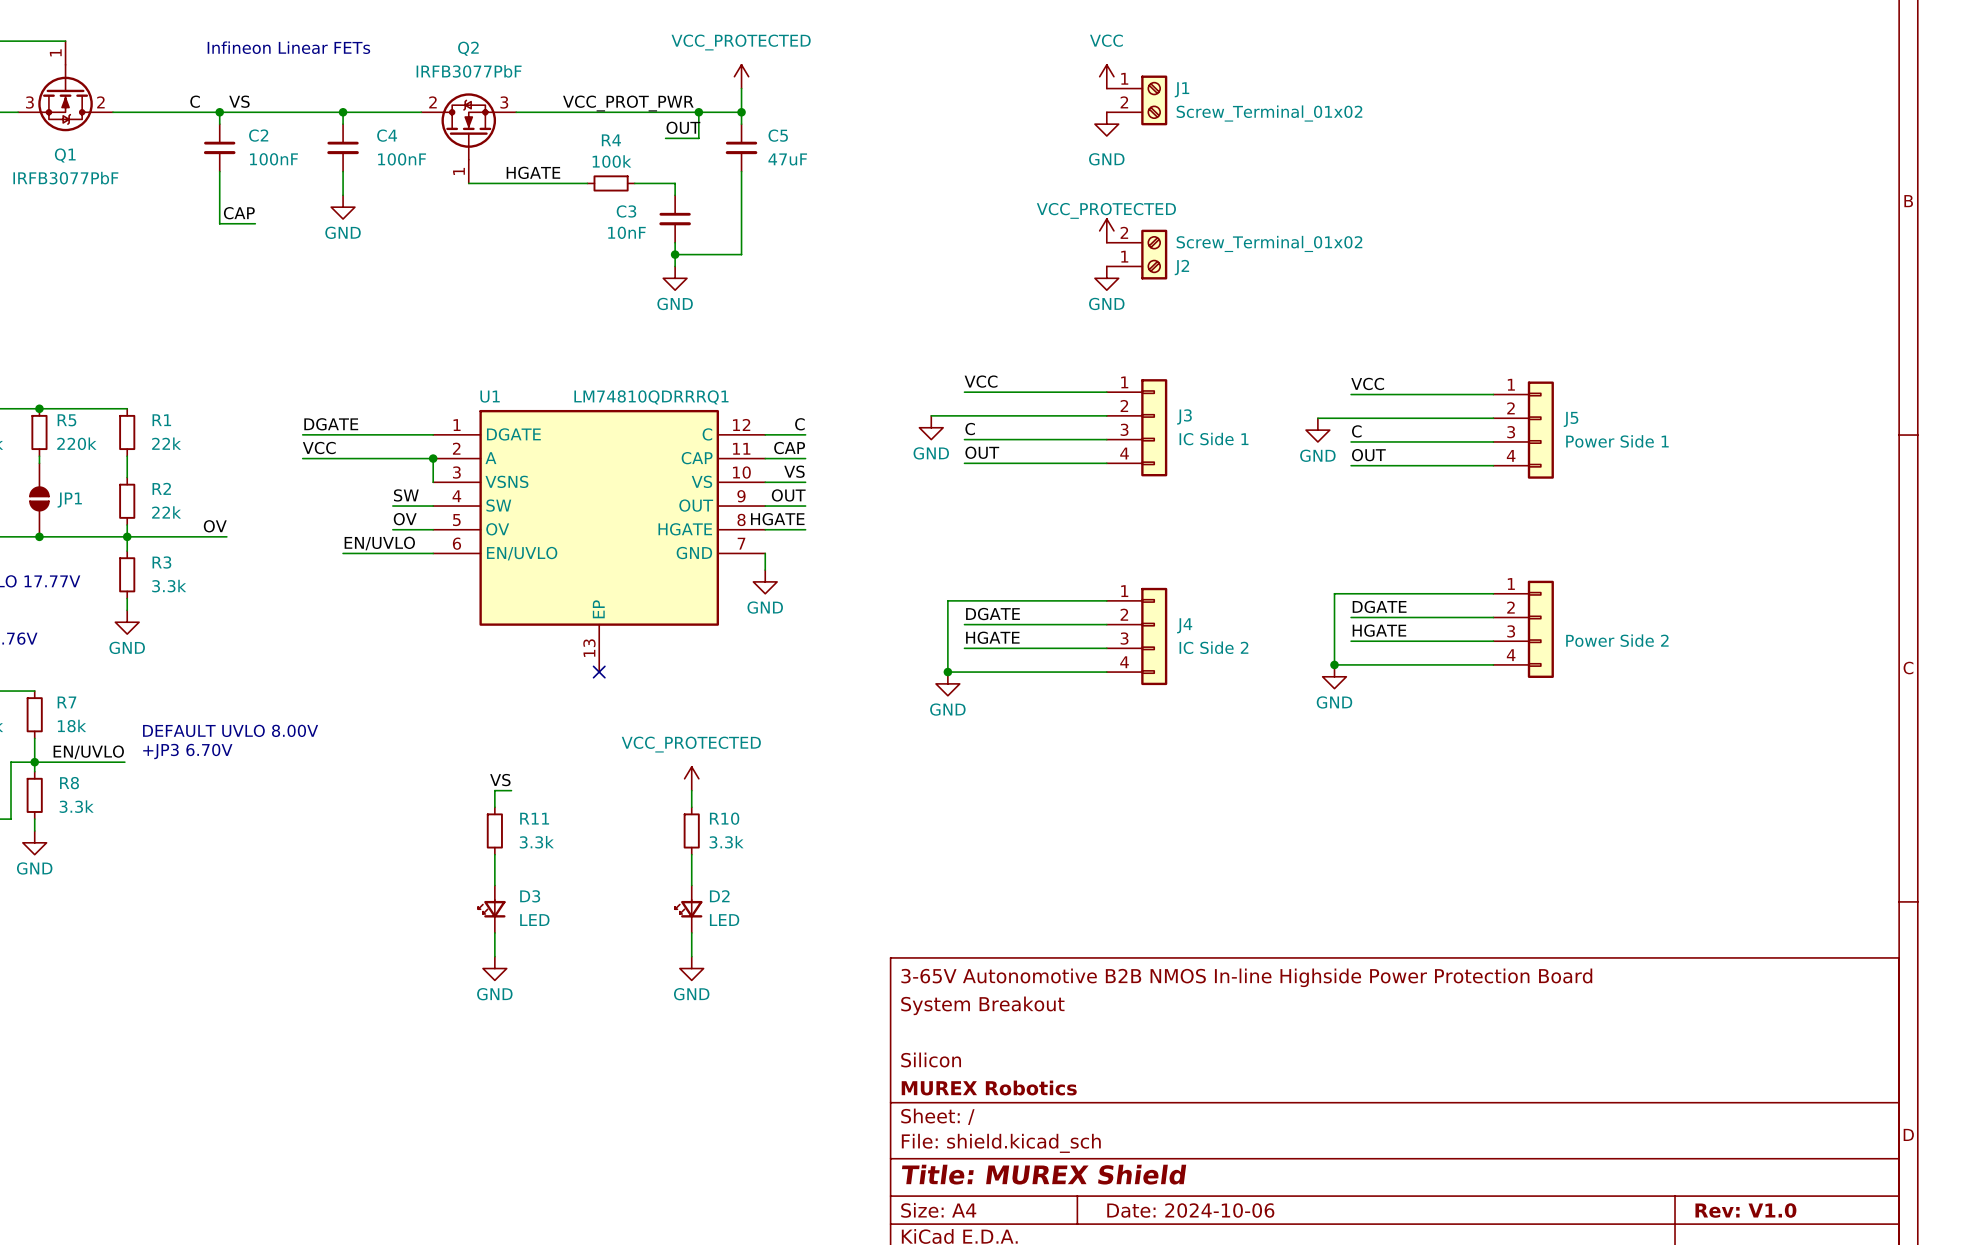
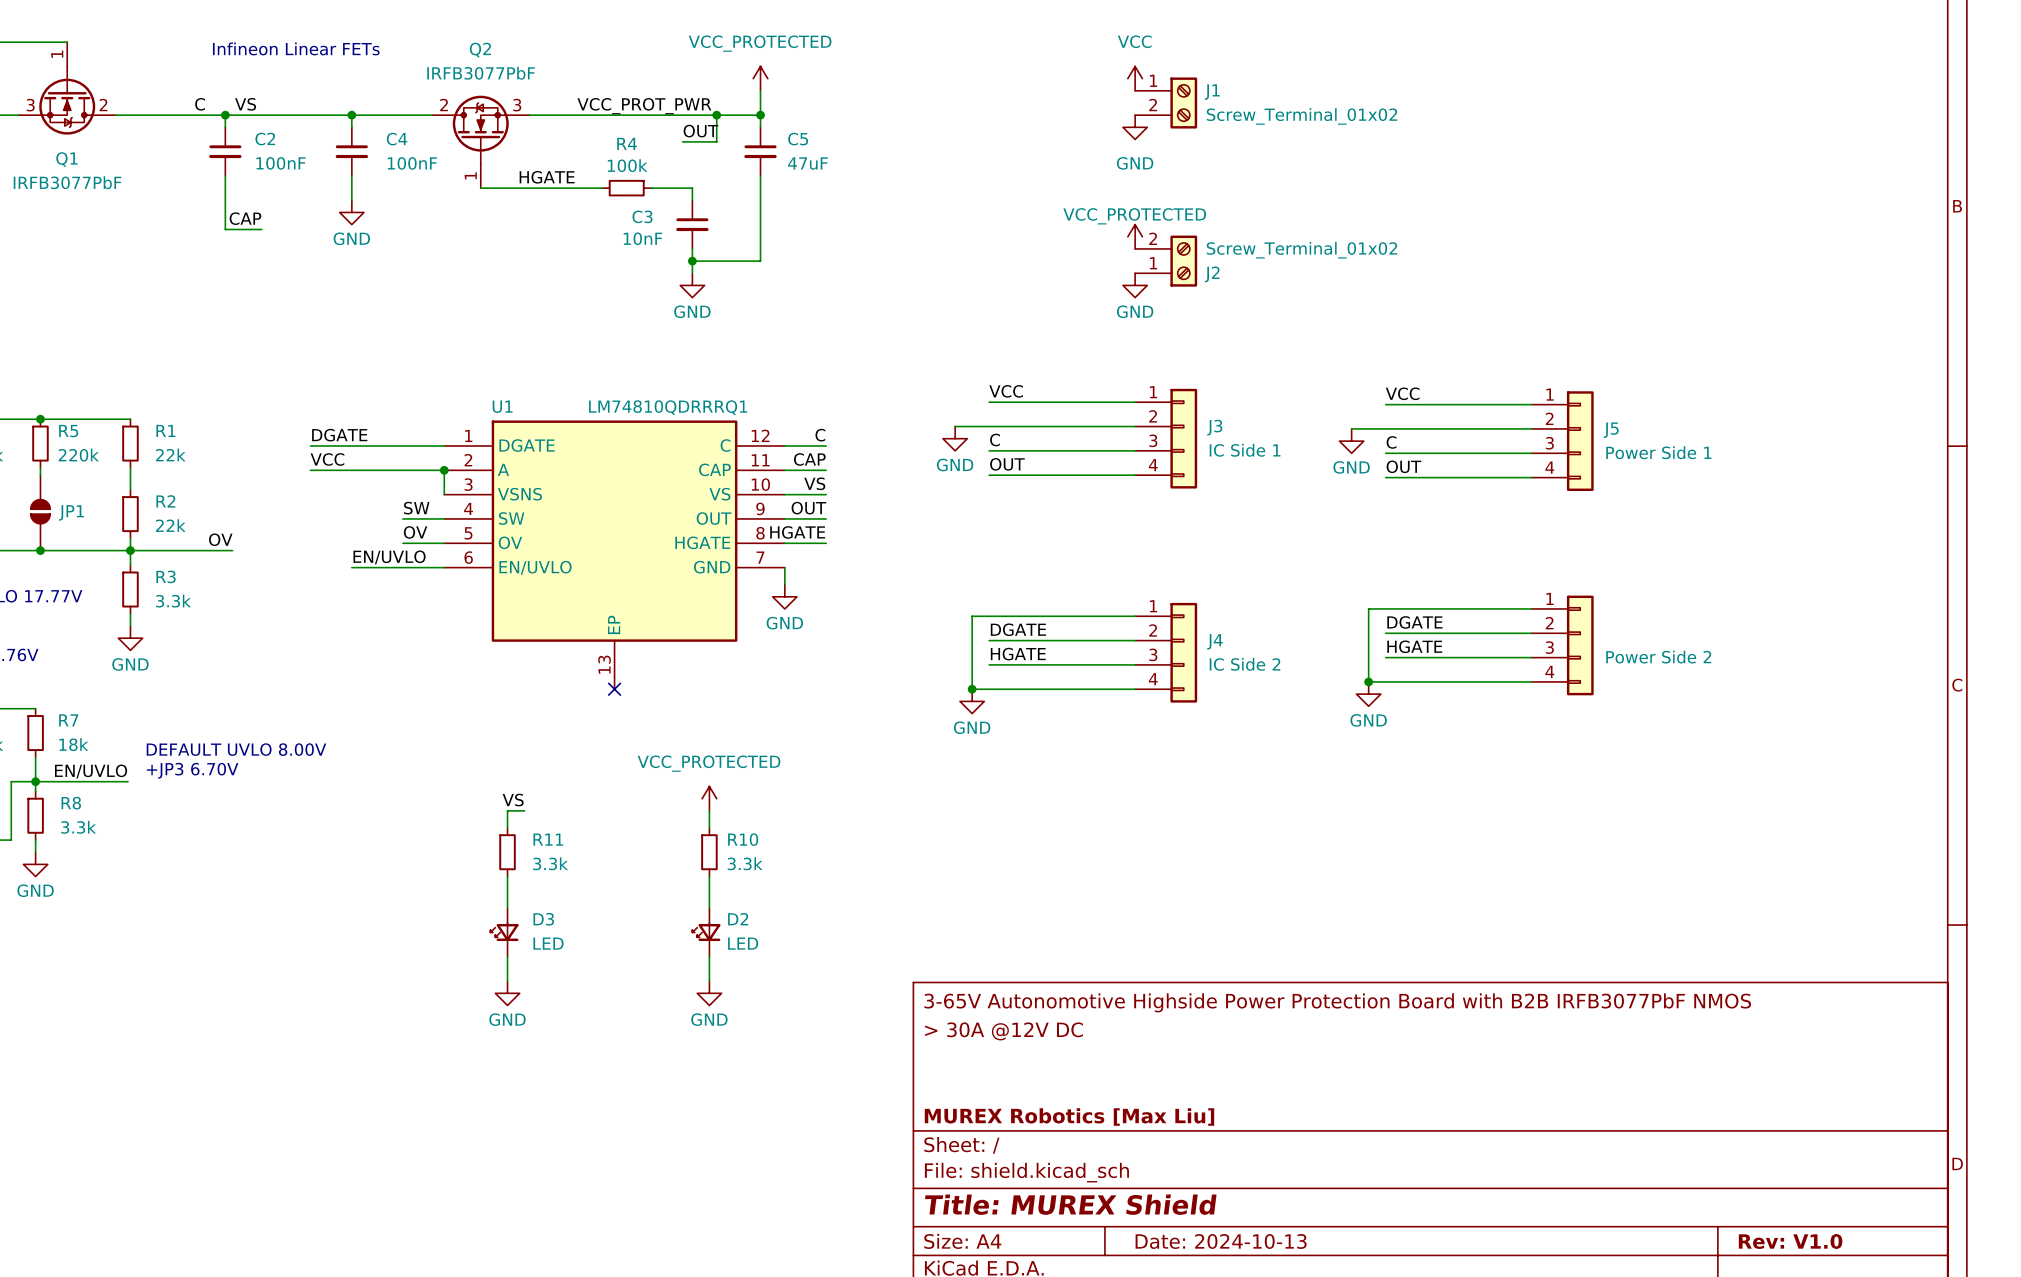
title block: 3-65V Autonomotive B2B NMOS In-line Highside Power Protection Board (1246, 977) -> 3-65V Autonomotive Highside Power Protection Board with B2B IRFB3077PbF NMOS (1337, 1002)
title block: System Breakout (982, 1005) -> > 30A @12V DC (1004, 1031)
title block: Silicon (931, 1060) -> none
title block: MUREX Robotics (989, 1088) -> MUREX Robotics [Max Liu] (1069, 1117)
title block: Date: 2024-10-06 (1190, 1210) -> Date: 2024-10-13 (1221, 1241)

